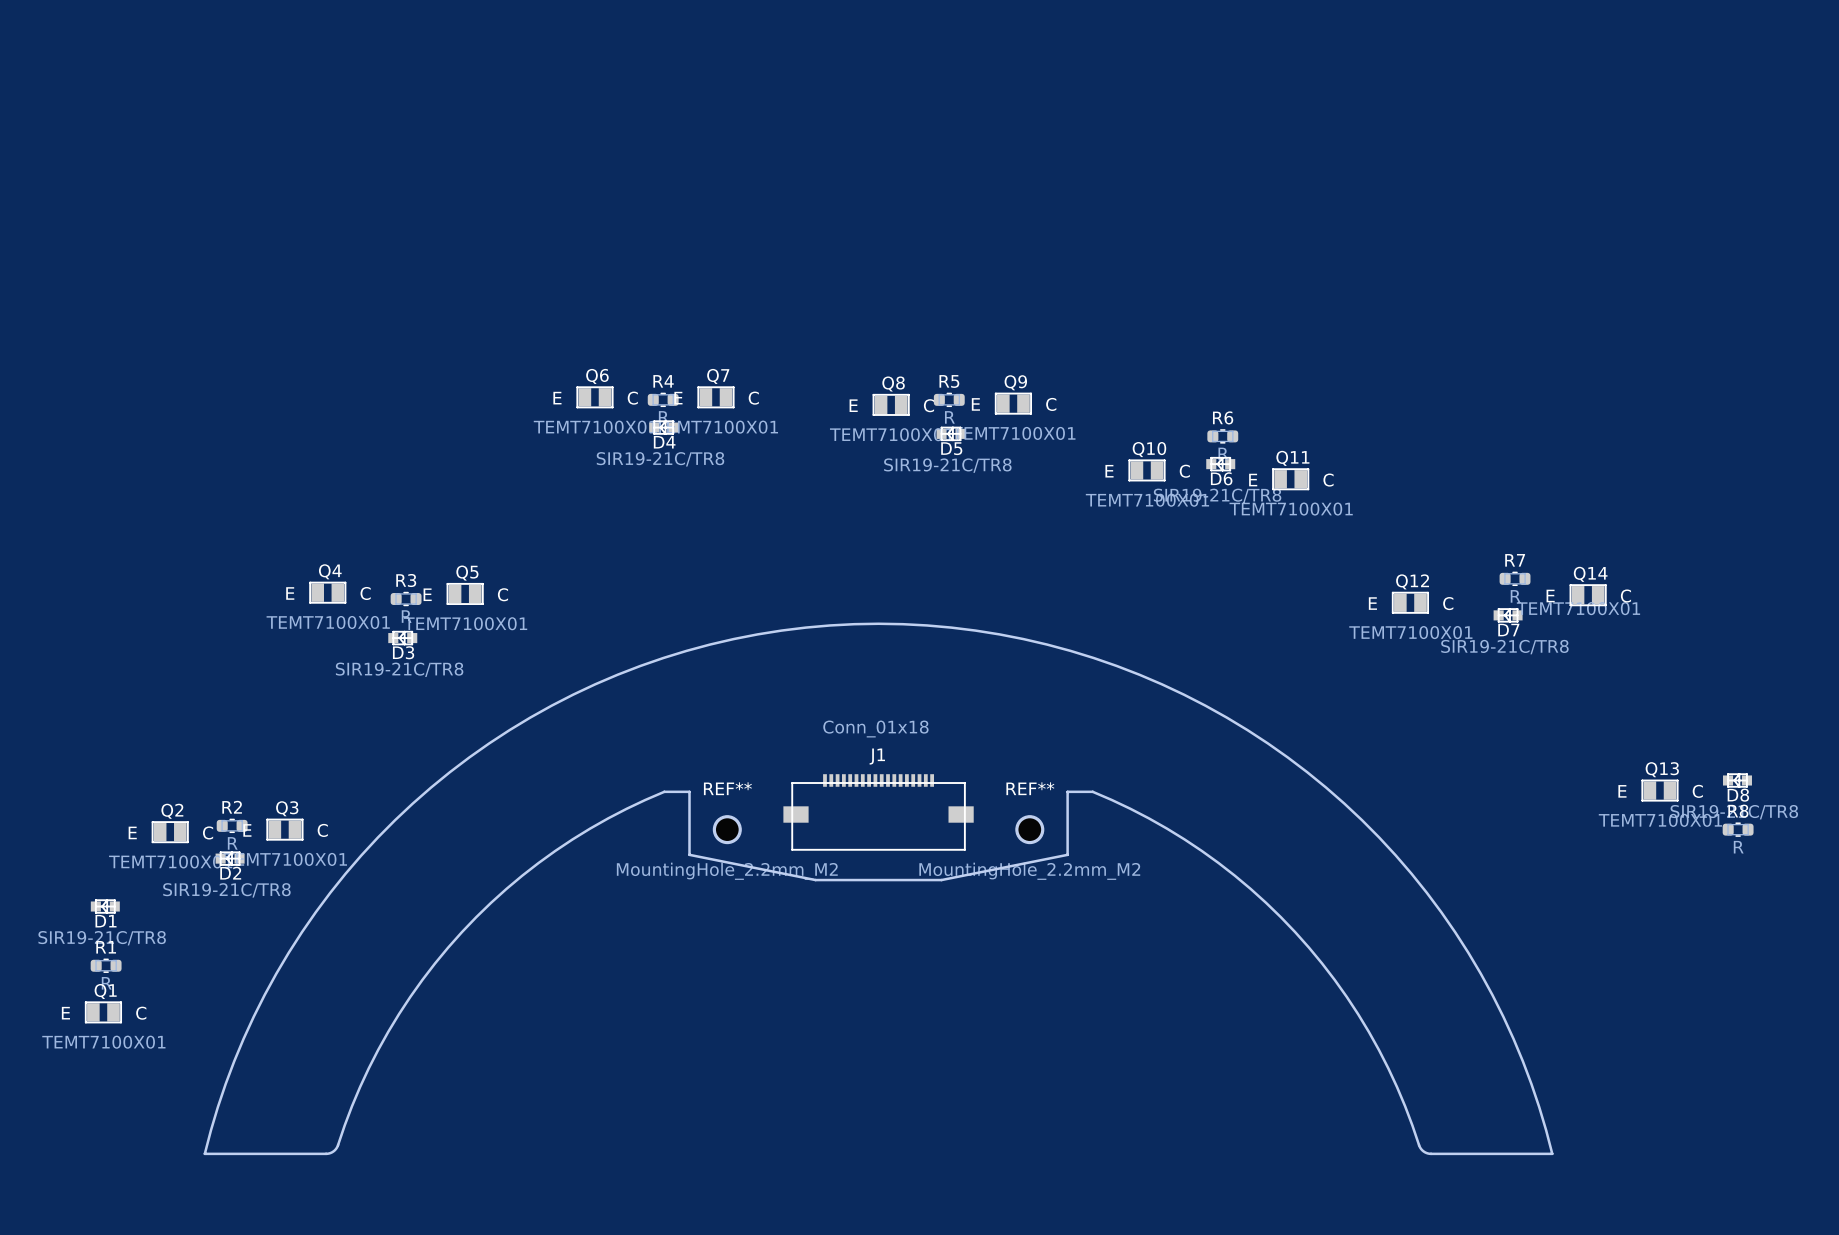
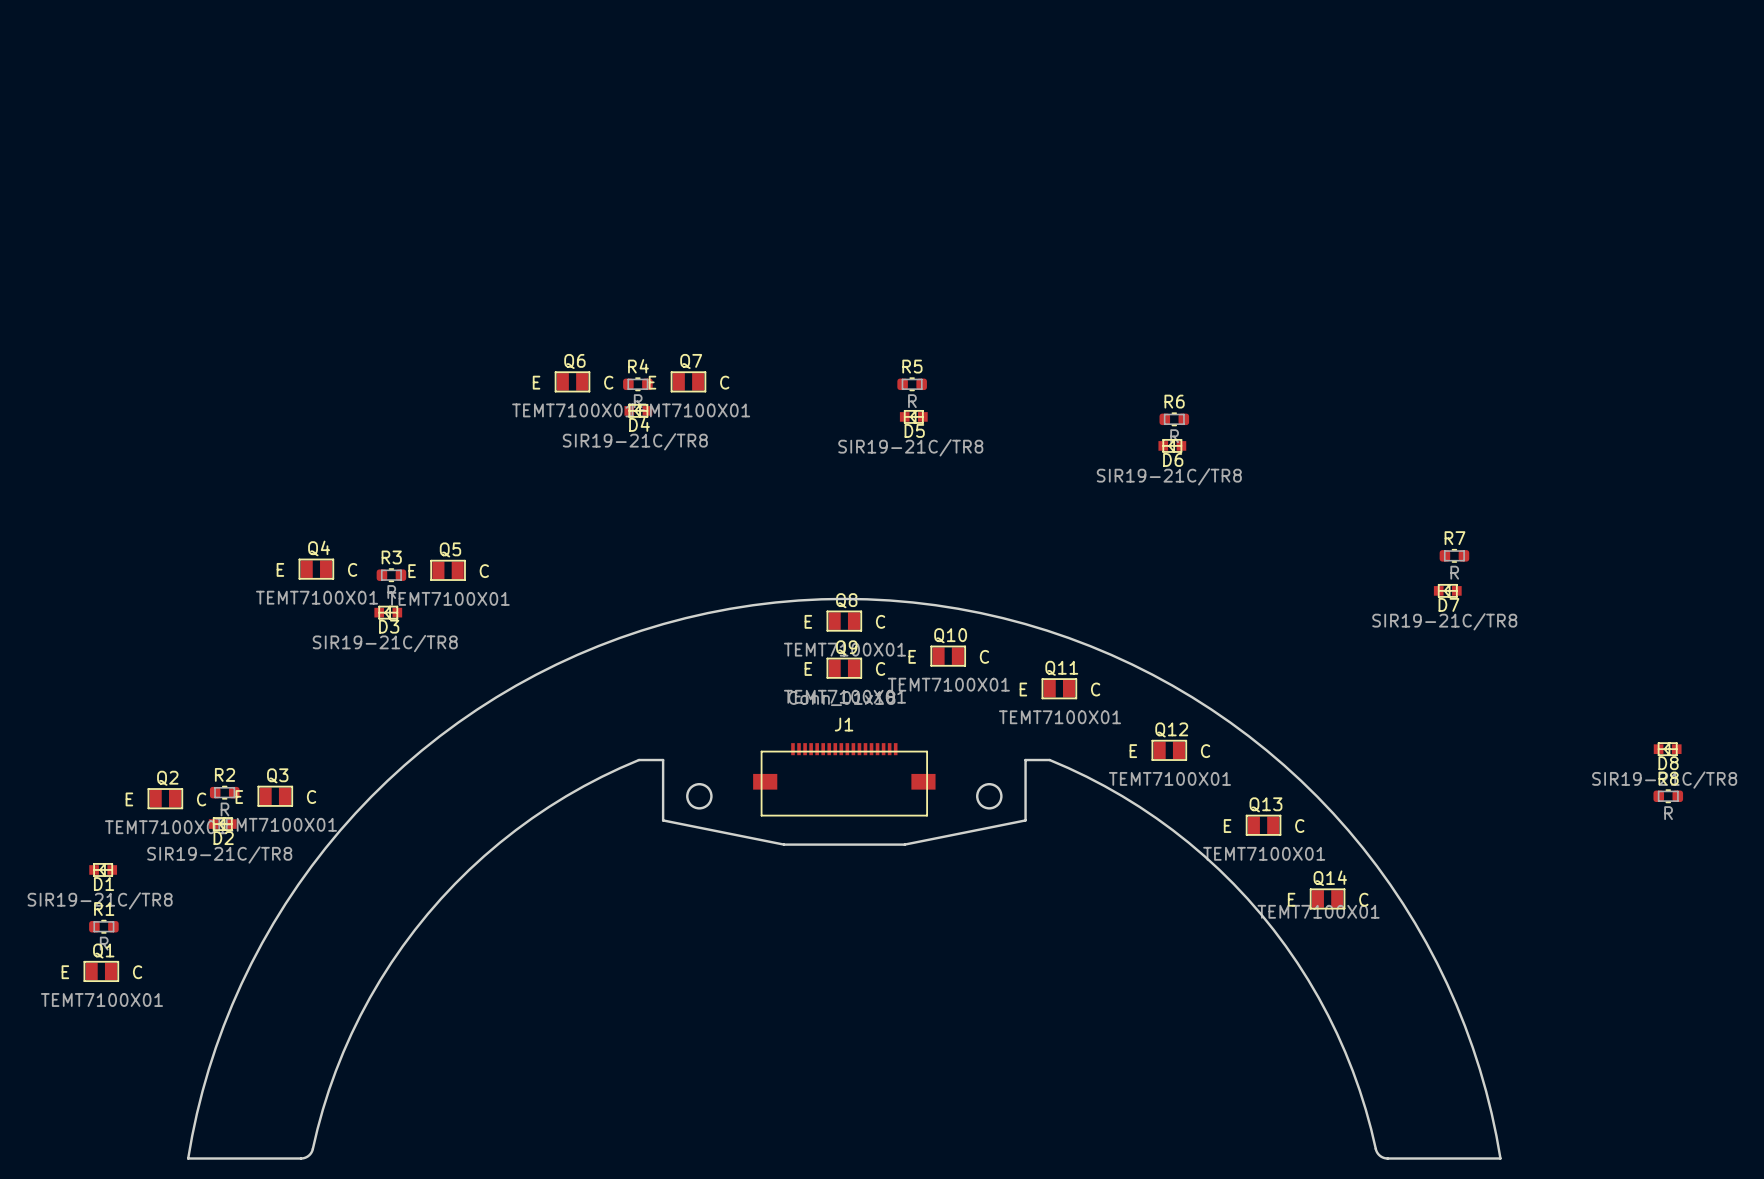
Q9 position: (1013, 403) -> (844, 668)
Q8 position: (891, 404) -> (844, 621)
Q10 position: (1147, 470) -> (948, 656)
Q11 position: (1290, 479) -> (1059, 688)
Q14 position: (1588, 595) -> (1327, 898)
Q12 position: (1410, 602) -> (1169, 750)
Q13 position: (1659, 790) -> (1263, 825)
board edge: (664, 791) (608, 818) (555, 850) (506, 888) (461, 932) (422, 979) (388, 1031) (360, 1087) (337, 1146) (333, 1151) (326, 1153) (204, 1153) (217, 1107) (234, 1061) (253, 1016) (288, 952) (330, 892) (361, 855) (395, 820) (449, 772) (489, 743) (530, 717) (573, 694) (640, 665) (710, 644) (757, 634) (829, 625) (878, 623) (951, 627) (999, 634) (1047, 644) (1116, 665) (1183, 694) (1226, 717) (1267, 743) (1307, 772) (1362, 820) (1395, 855) (1426, 892) (1455, 932) (1480, 973) (1513, 1038) (1539, 1107) (1552, 1153) (1431, 1153) (1423, 1151) (1419, 1146) (1397, 1087) (1368, 1031) (1334, 979) (1295, 932) (1250, 888) (1201, 850) (1148, 818) (1092, 791) -> (638, 760) (601, 776) (566, 796) (515, 830) (469, 869) (427, 914) (391, 962) (360, 1015) (335, 1071) (322, 1109) (312, 1150) (308, 1155) (301, 1158) (188, 1158) (196, 1113) (215, 1047) (232, 1004) (262, 943) (285, 903) (325, 848) (355, 813) (404, 765) (458, 722) (496, 697) (536, 674) (598, 646) (663, 623) (707, 613) (775, 602) (844, 598) (890, 600) (958, 608) (1003, 618) (1068, 637) (1132, 664) (1192, 697) (1230, 722) (1284, 765) (1333, 813) (1363, 848) (1403, 903) (1426, 943) (1447, 983) (1472, 1047) (1486, 1091) (1500, 1158) (1387, 1158) (1380, 1155) (1376, 1150) (1365, 1109) (1352, 1071) (1328, 1015) (1297, 962) (1260, 914) (1219, 869) (1172, 830) (1122, 796) (1086, 776) (1049, 760)
REF**: MountingHole_2.2mm_M2 (727, 829) -> none
REF**: MountingHole_2.2mm_M2 (1029, 829) -> none

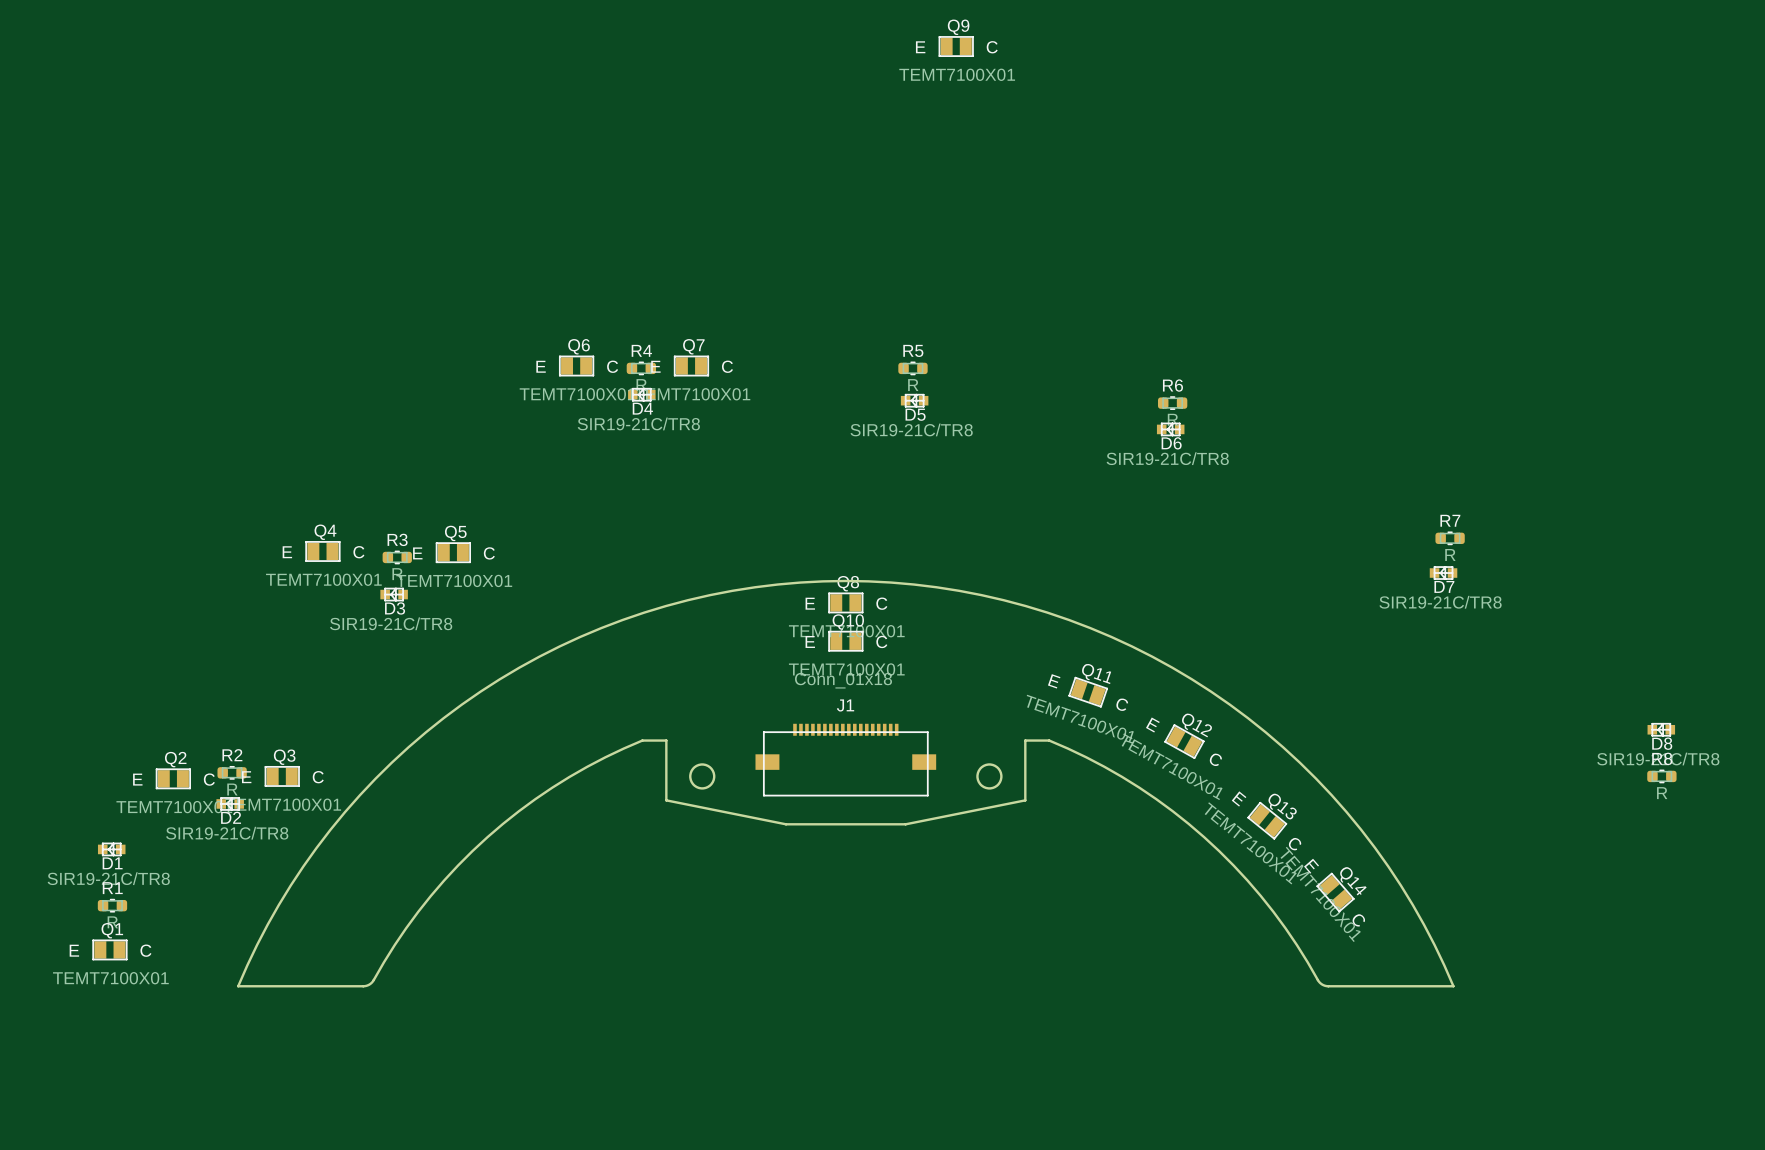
Q10 position: (948, 656) -> (845, 641)
Q9 position: (844, 668) -> (956, 46)
Q11 rotation: 0° (1059, 688) -> 19° clockwise (1088, 692)
Q11 position: (1059, 688) -> (1088, 692)
Q12 rotation: 0° (1169, 750) -> 29° clockwise (1184, 741)
board edge: (638, 760) (601, 776) (566, 796) (515, 830) (469, 869) (427, 914) (391, 962) (360, 1015) (335, 1071) (322, 1109) (312, 1150) (308, 1155) (301, 1158) (188, 1158) (196, 1113) (215, 1047) (232, 1004) (262, 943) (285, 903) (325, 848) (355, 813) (404, 765) (458, 722) (496, 697) (536, 674) (598, 646) (663, 623) (707, 613) (775, 602) (844, 598) (890, 600) (958, 608) (1003, 618) (1068, 637) (1132, 664) (1192, 697) (1230, 722) (1284, 765) (1333, 813) (1363, 848) (1403, 903) (1426, 943) (1447, 983) (1472, 1047) (1486, 1091) (1500, 1158) (1387, 1158) (1380, 1155) (1376, 1150) (1365, 1109) (1352, 1071) (1328, 1015) (1297, 962) (1260, 914) (1219, 869) (1172, 830) (1122, 796) (1086, 776) (1049, 760) -> (642, 740) (587, 766) (552, 787) (518, 811) (487, 837) (458, 865) (430, 895) (406, 928) (369, 984) (363, 986) (238, 986) (257, 944) (278, 904) (303, 866) (330, 829) (359, 795) (408, 747) (443, 718) (480, 691) (519, 667) (559, 646) (601, 628) (644, 612) (687, 600) (755, 587) (800, 582) (845, 580) (891, 582) (959, 590) (1003, 600) (1047, 612) (1090, 628) (1131, 646) (1172, 667) (1211, 691) (1265, 732) (1299, 762) (1331, 795) (1361, 829) (1388, 866) (1412, 904) (1434, 944) (1453, 986) (1328, 986) (1322, 984) (1285, 928) (1260, 895) (1233, 865) (1204, 837) (1172, 811) (1139, 787) (1104, 766) (1049, 740)
Q13 rotation: 0° (1263, 825) -> 39° clockwise (1267, 820)
Q14 rotation: 0° (1327, 898) -> 49° clockwise (1335, 892)

